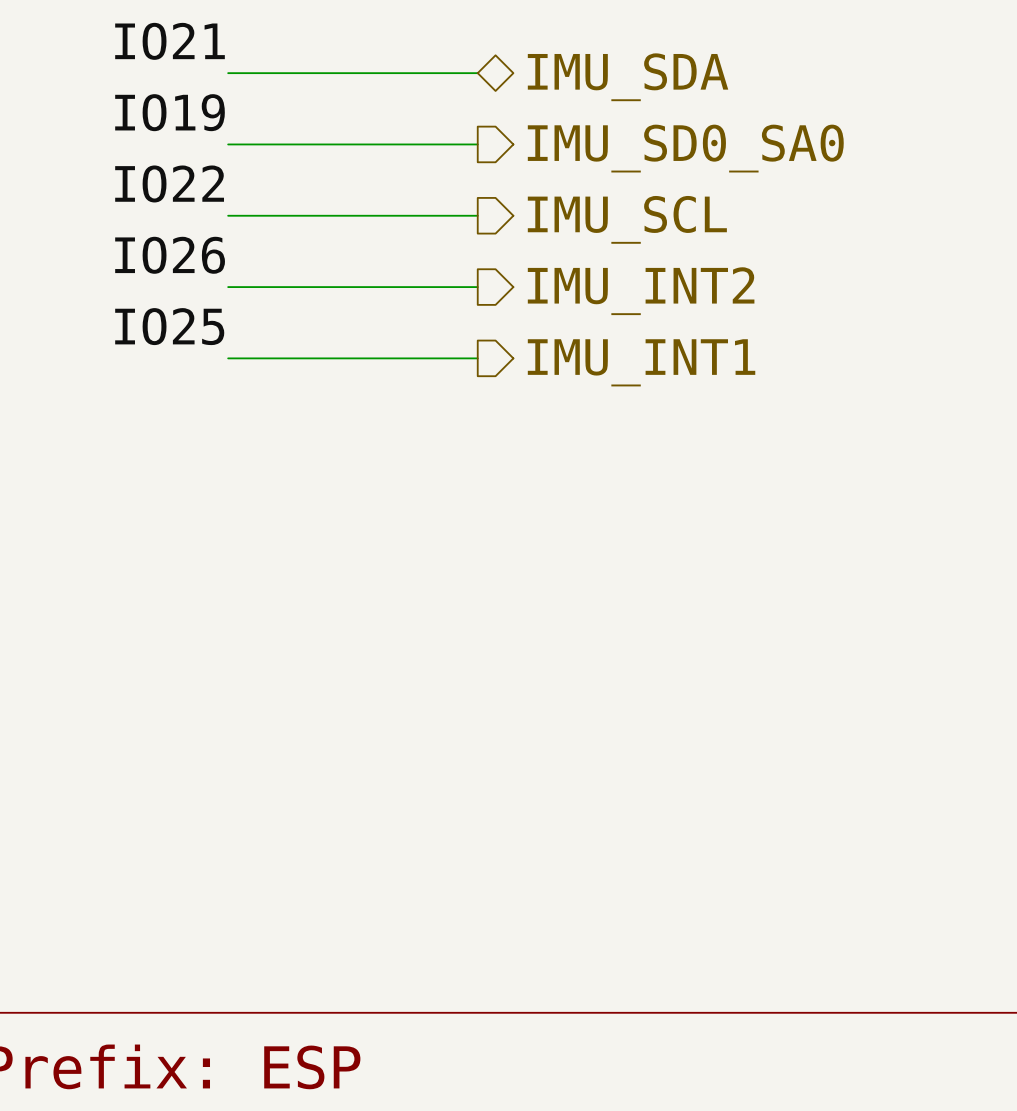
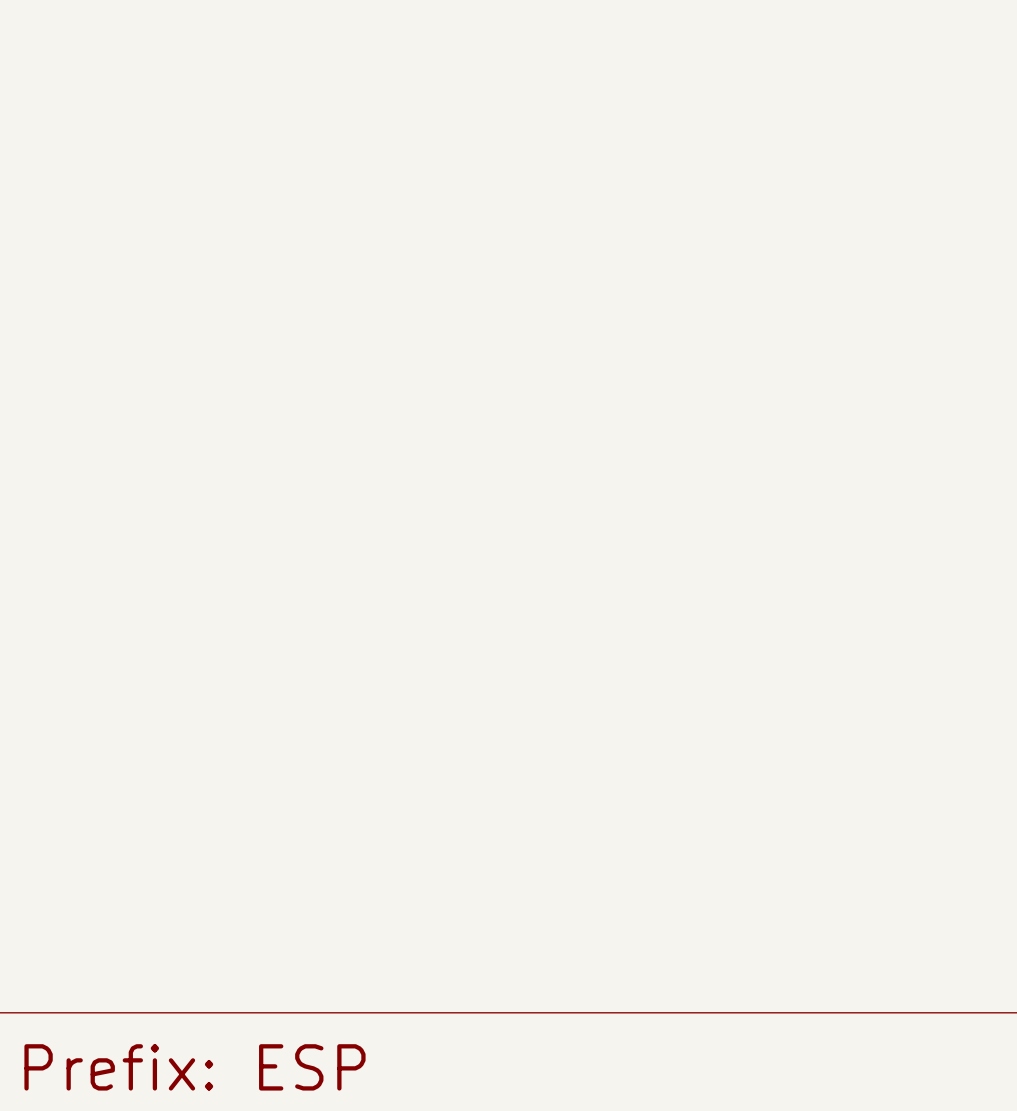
label: IO21 (170, 41) -> none
wire: (228, 73) (477, 73) -> none
hierarchical label: IMU_SDA (628, 77) -> none
label: IO19 (170, 112) -> none
wire: (228, 144) (477, 144) -> none
hierarchical label: IMU_SD0_SA0 (685, 148) -> none
label: IO22 (169, 183) -> none
wire: (228, 215) (477, 215) -> none
hierarchical label: IMU_SCL (627, 219) -> none
label: IO26 (170, 255) -> none
wire: (228, 287) (477, 287) -> none
hierarchical label: IMU_INT2 (641, 291) -> none
label: IO25 (169, 326) -> none
wire: (228, 358) (477, 358) -> none
hierarchical label: IMU_INT1 (641, 362) -> none

